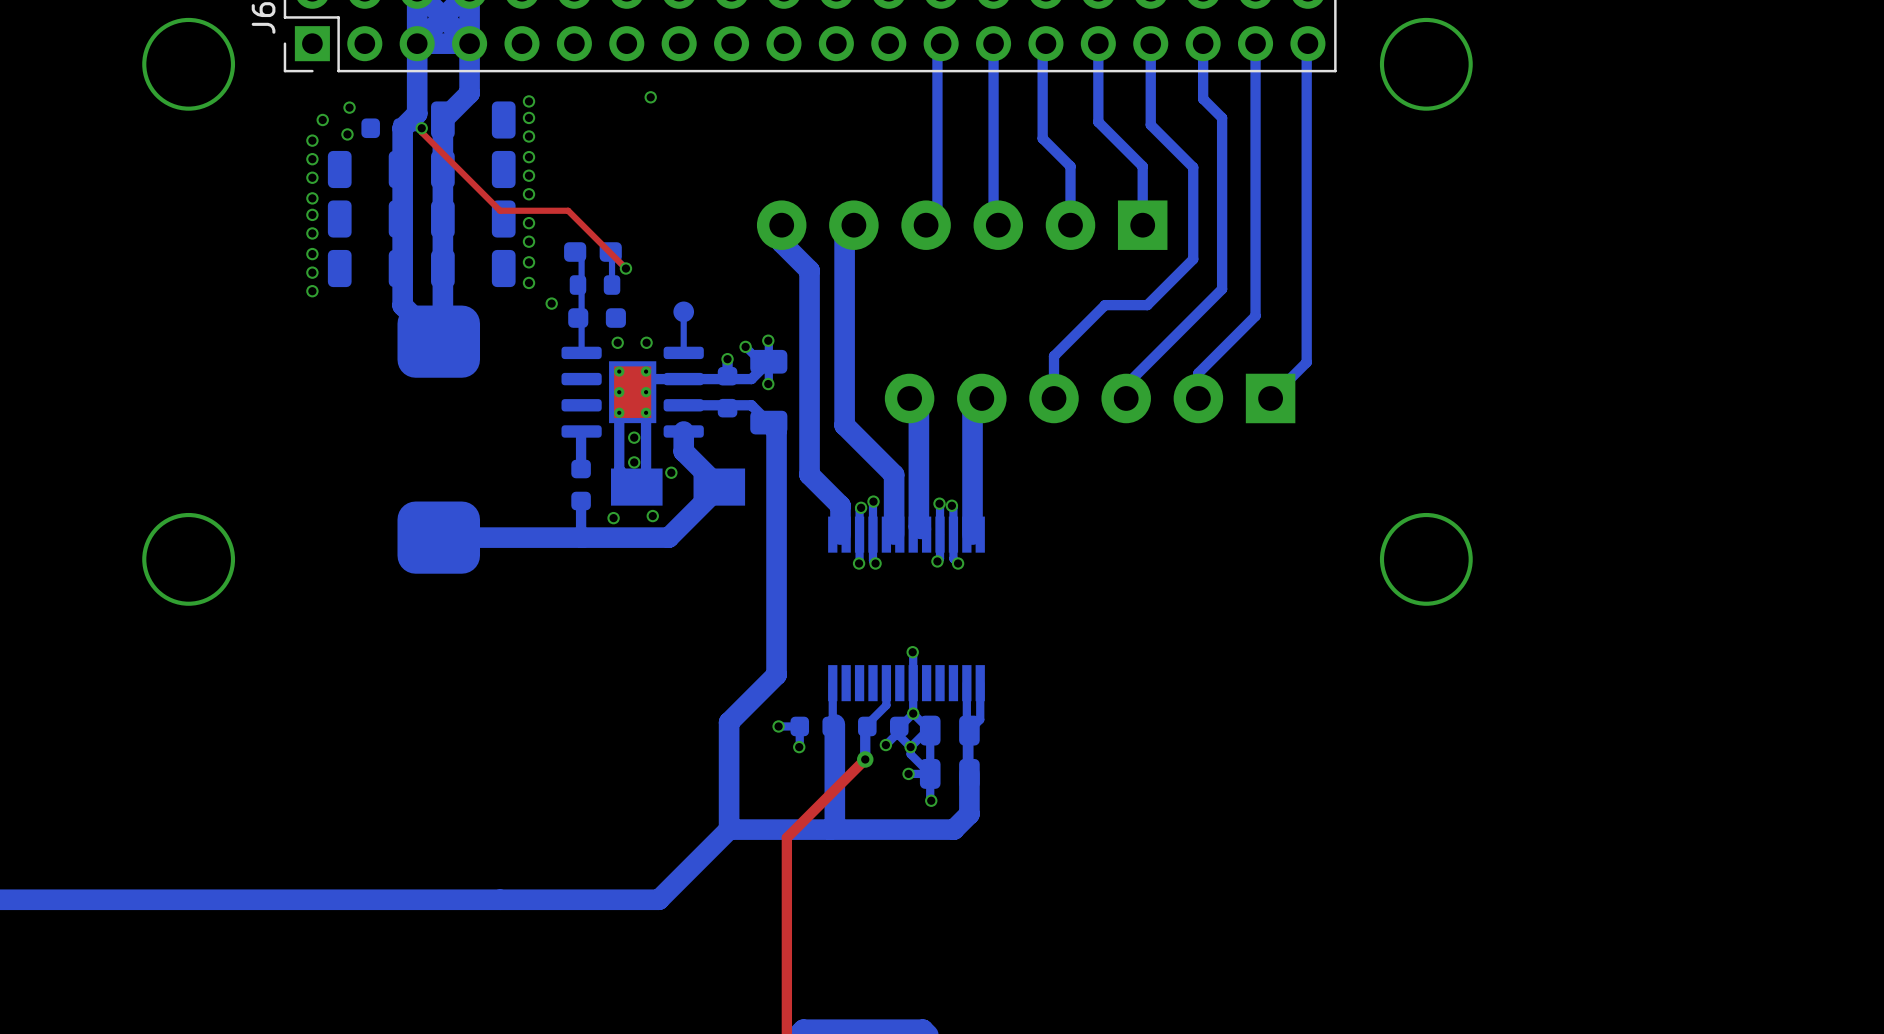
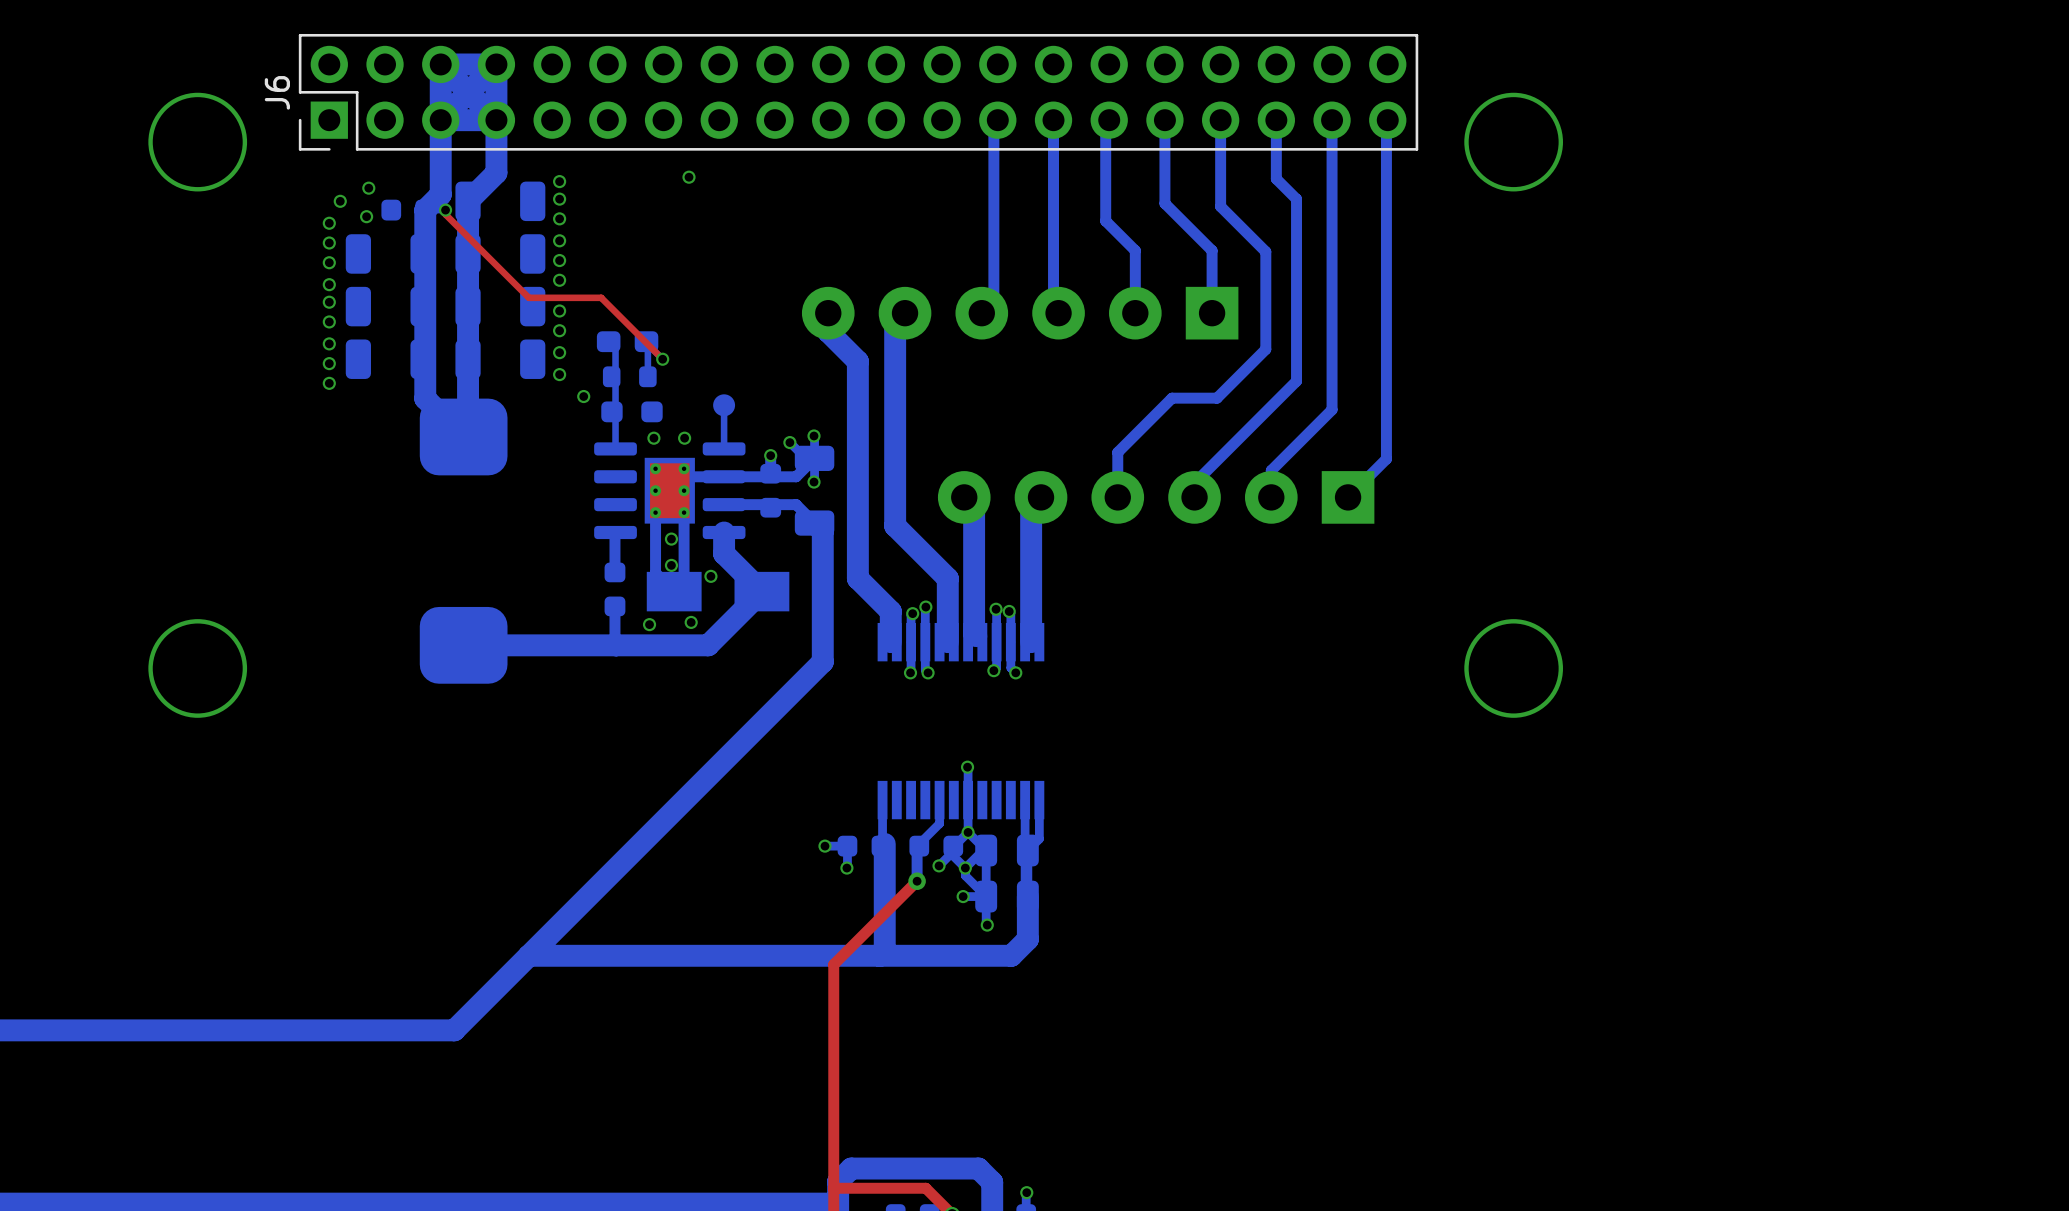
bottom track: (776, 553) (776, 674) (729, 722) (729, 829) (658, 899) (429, 899) -> (822, 661) (454, 1030)
bottom track: none -> (528, 955) (772, 955)

